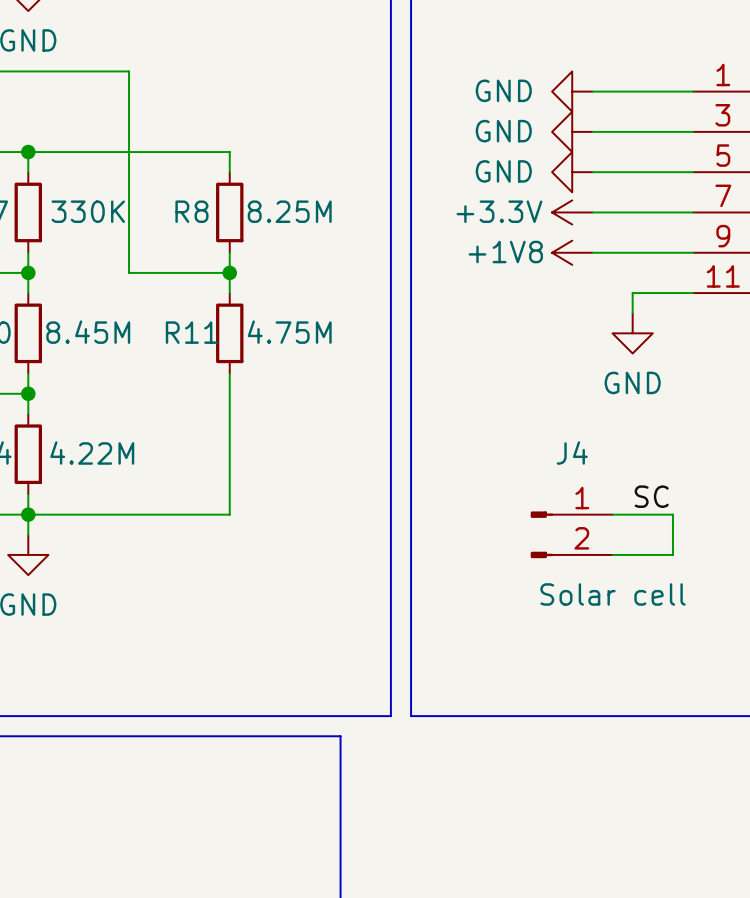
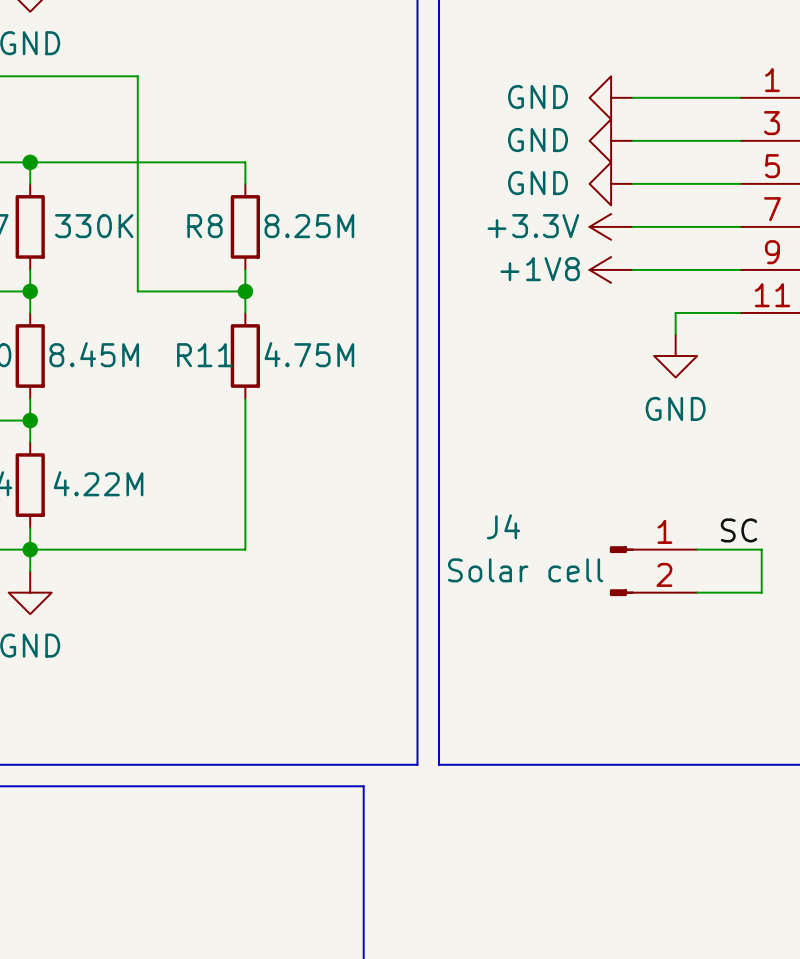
J4 name position: J4 (572, 452) -> J4 (503, 526)
label position: SC (651, 496) -> SC (739, 530)
wire: (672, 514) (672, 554) -> (718, 549) (761, 549) (761, 592) (718, 592)
J4 position: (571, 534) -> (653, 571)
J4 value position: Solar cell (613, 594) -> Solar cell (525, 570)

